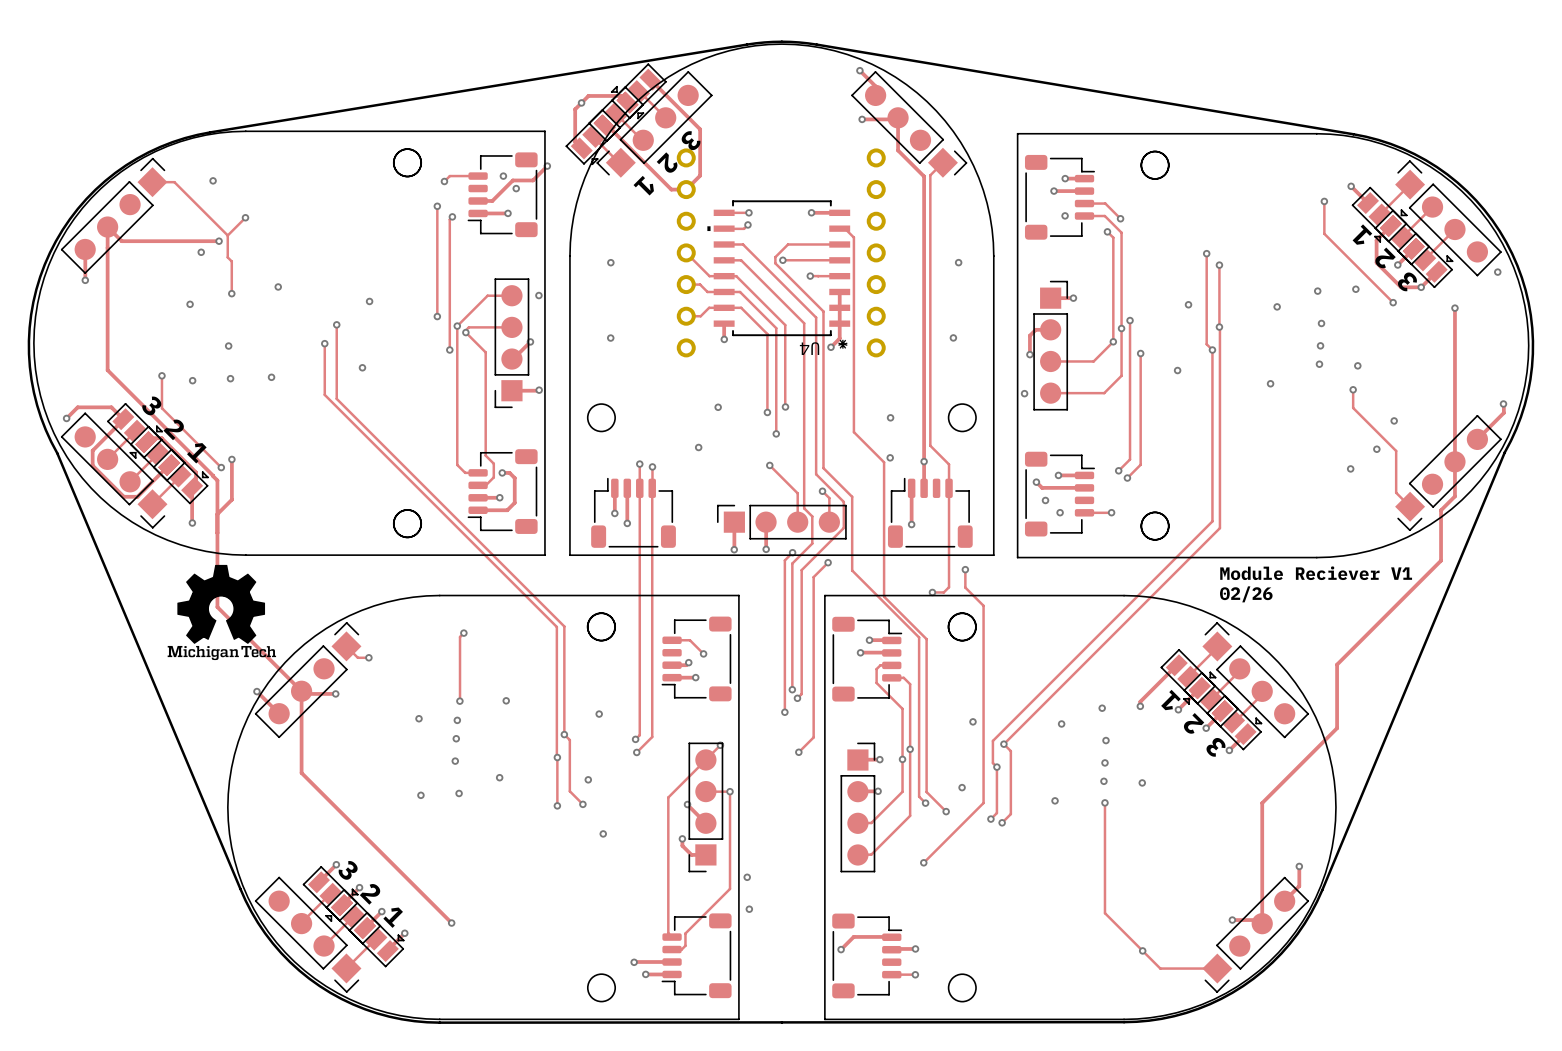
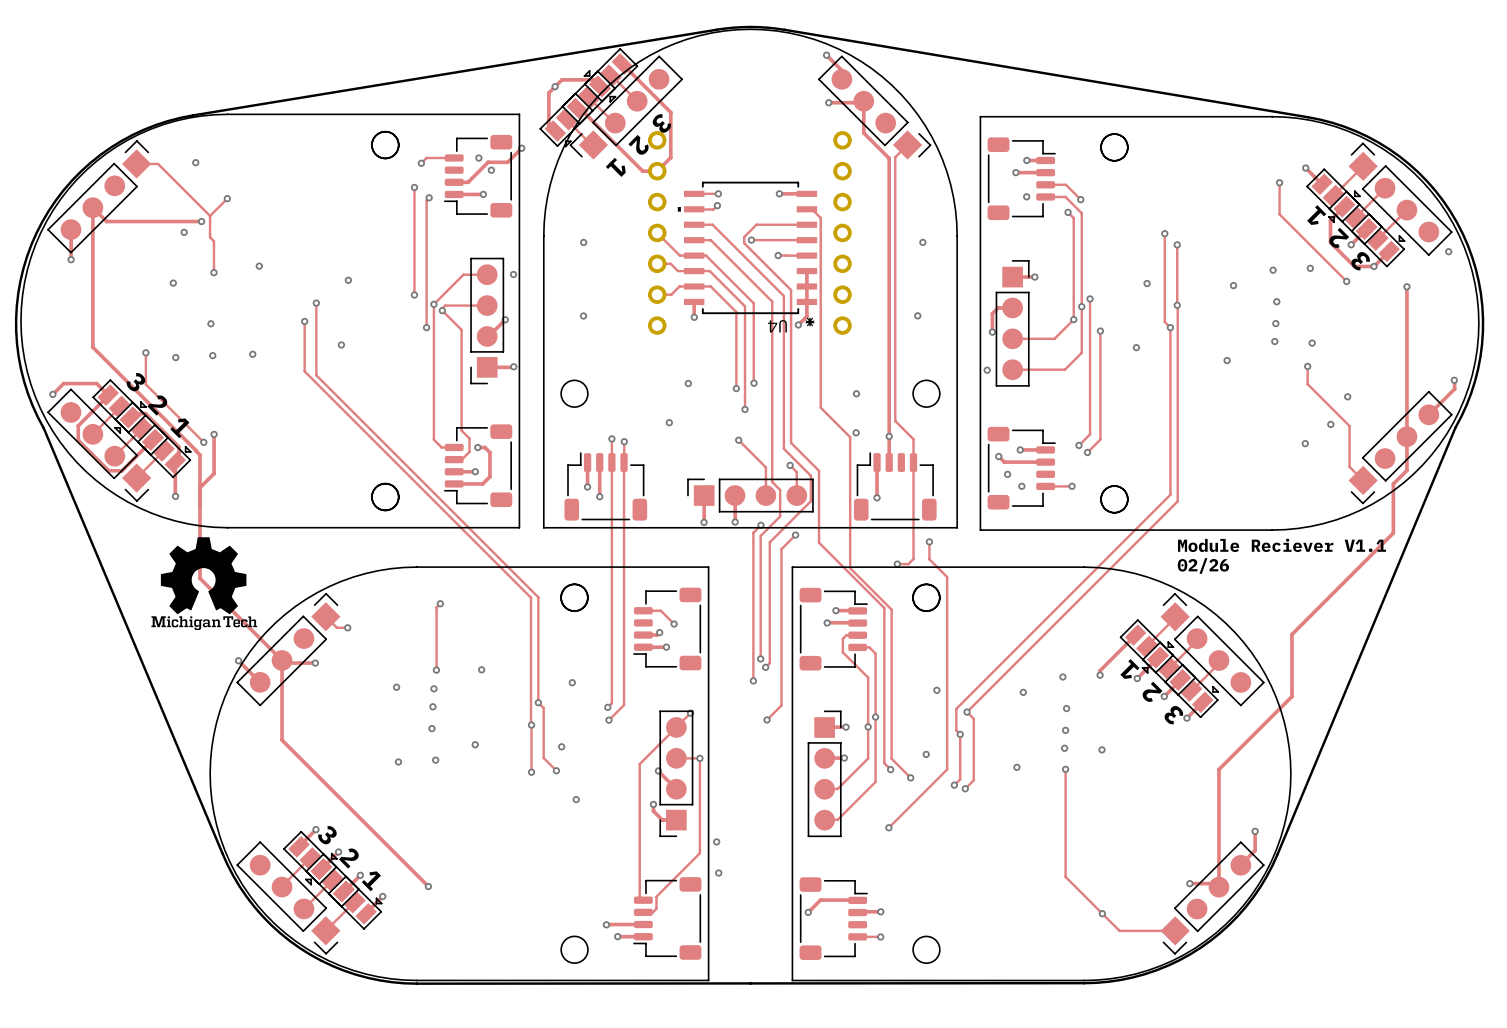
text: Module Reciever V1 (1316, 573) -> Module Reciever V1.1 (1282, 545)

